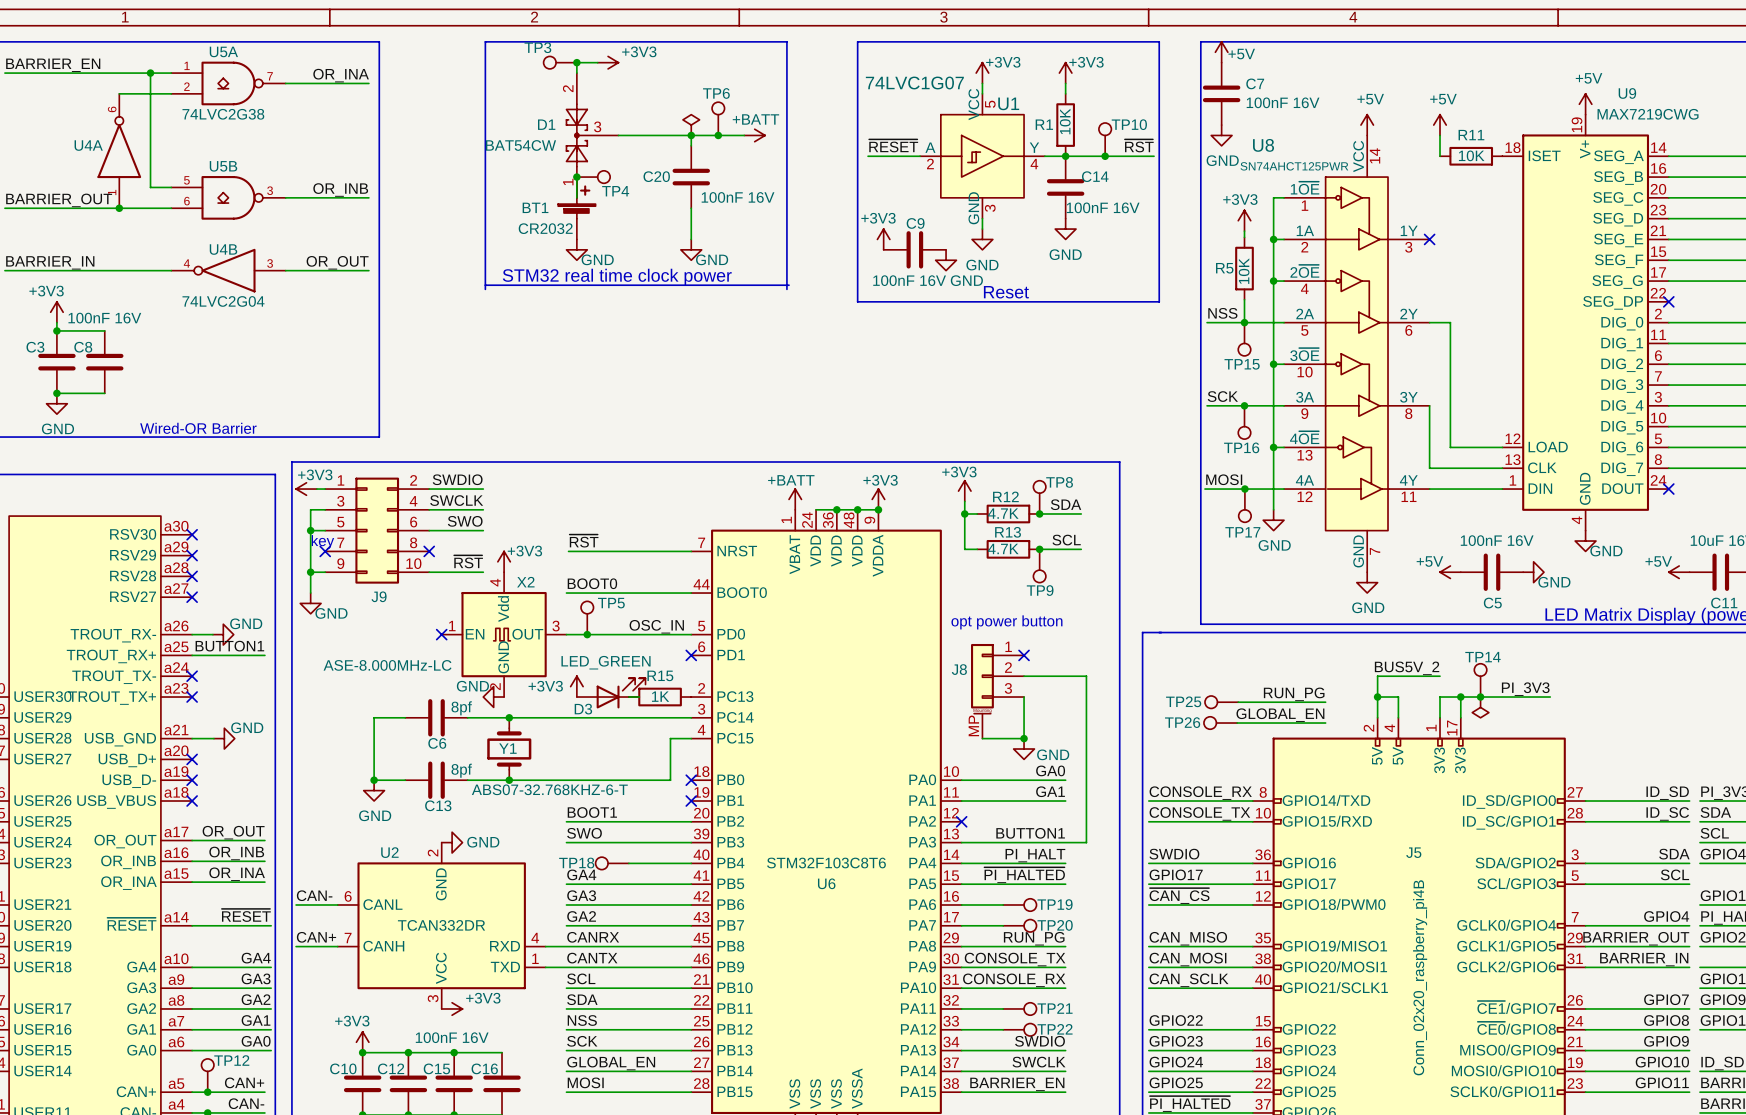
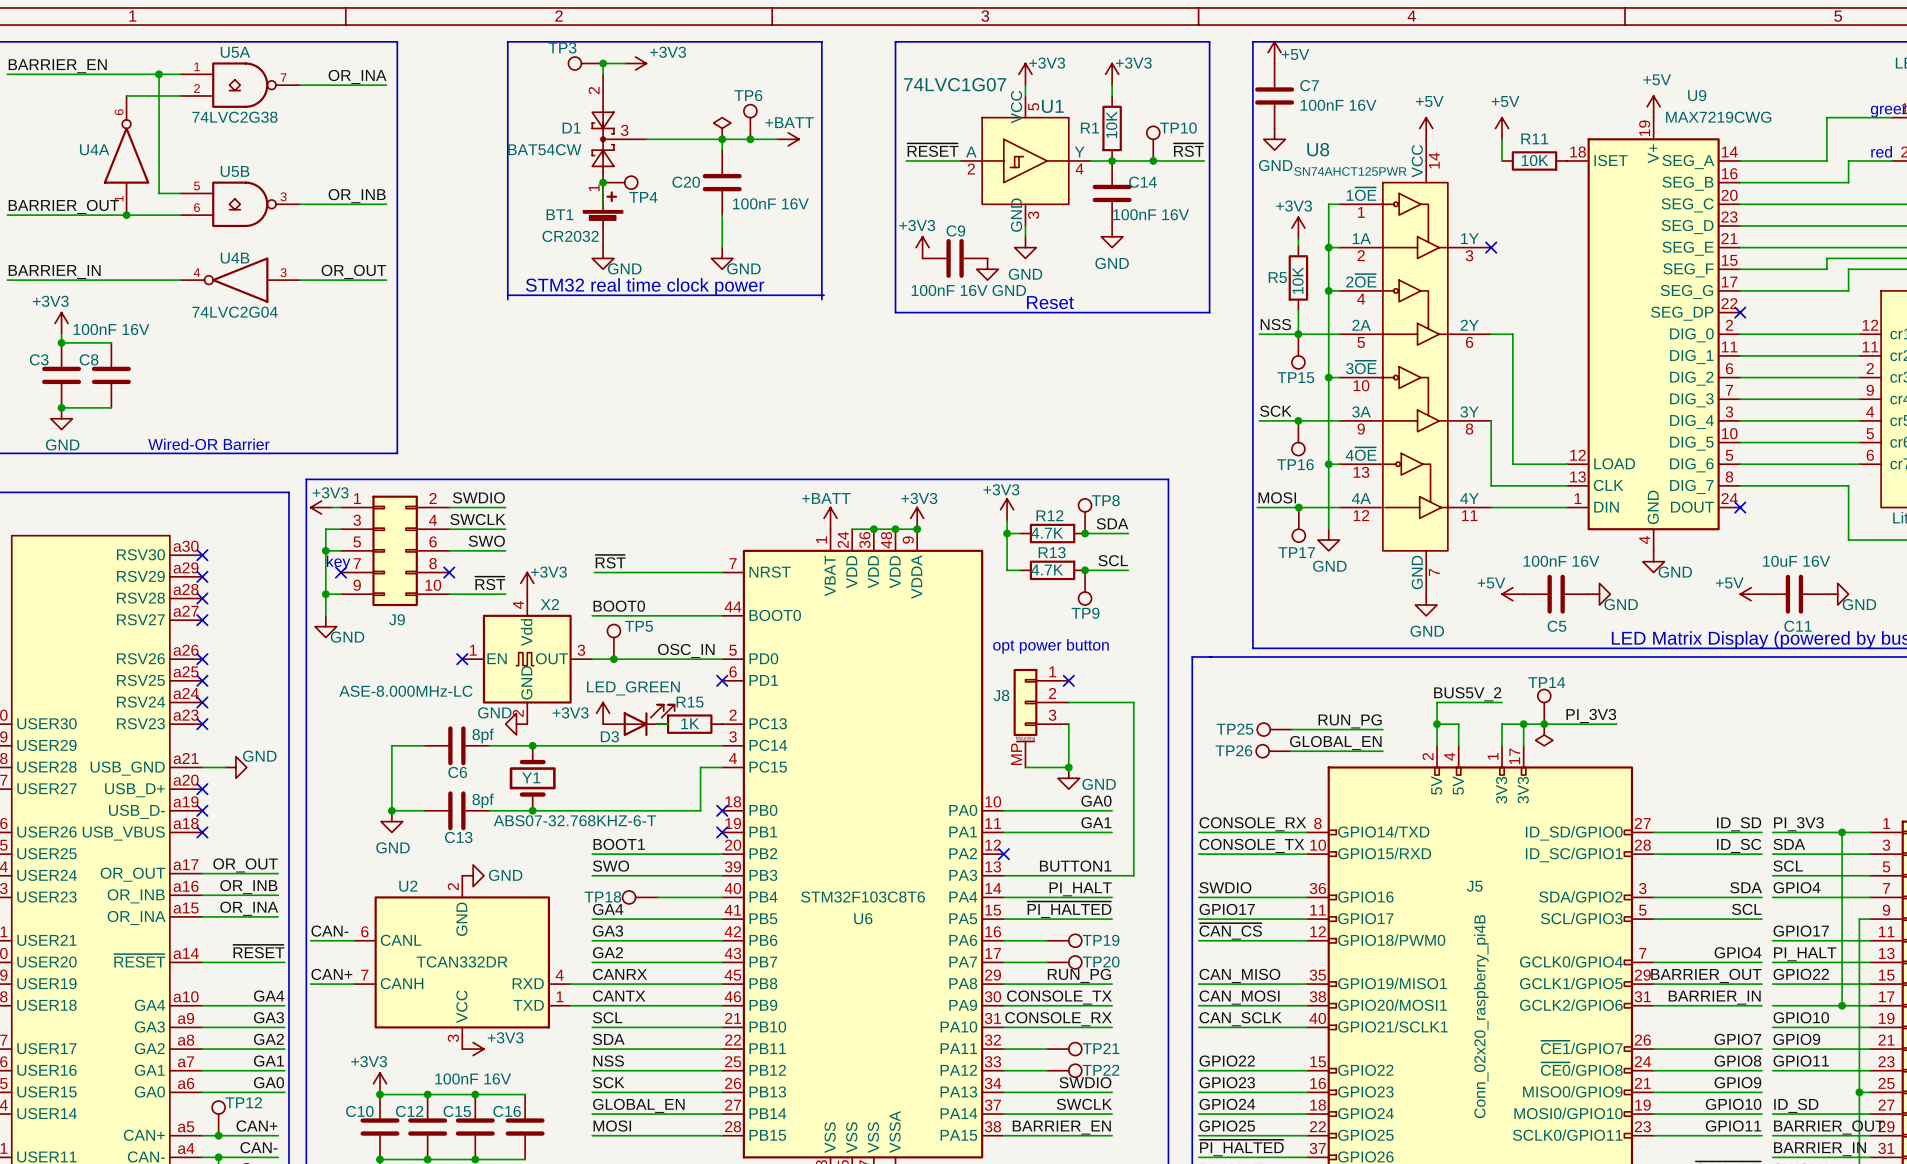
wire: (192, 634) (212, 634) -> none
no-connect mark: none -> (202, 659)
power symbol: GND (223, 634) -> none
part pin name: TROUT_RX- (113, 635) -> RSV26 (140, 658)
label: BUTTON1 (229, 646) -> none
wire: (192, 655) (264, 655) -> none
no-connect mark: none -> (202, 680)
part pin name: TROUT_RX+ (111, 656) -> RSV25 (140, 680)
part pin name: TROUT_TX- (114, 677) -> RSV24 (141, 702)
part pin name: TROUT_TX+ (112, 698) -> RSV23 (140, 723)

